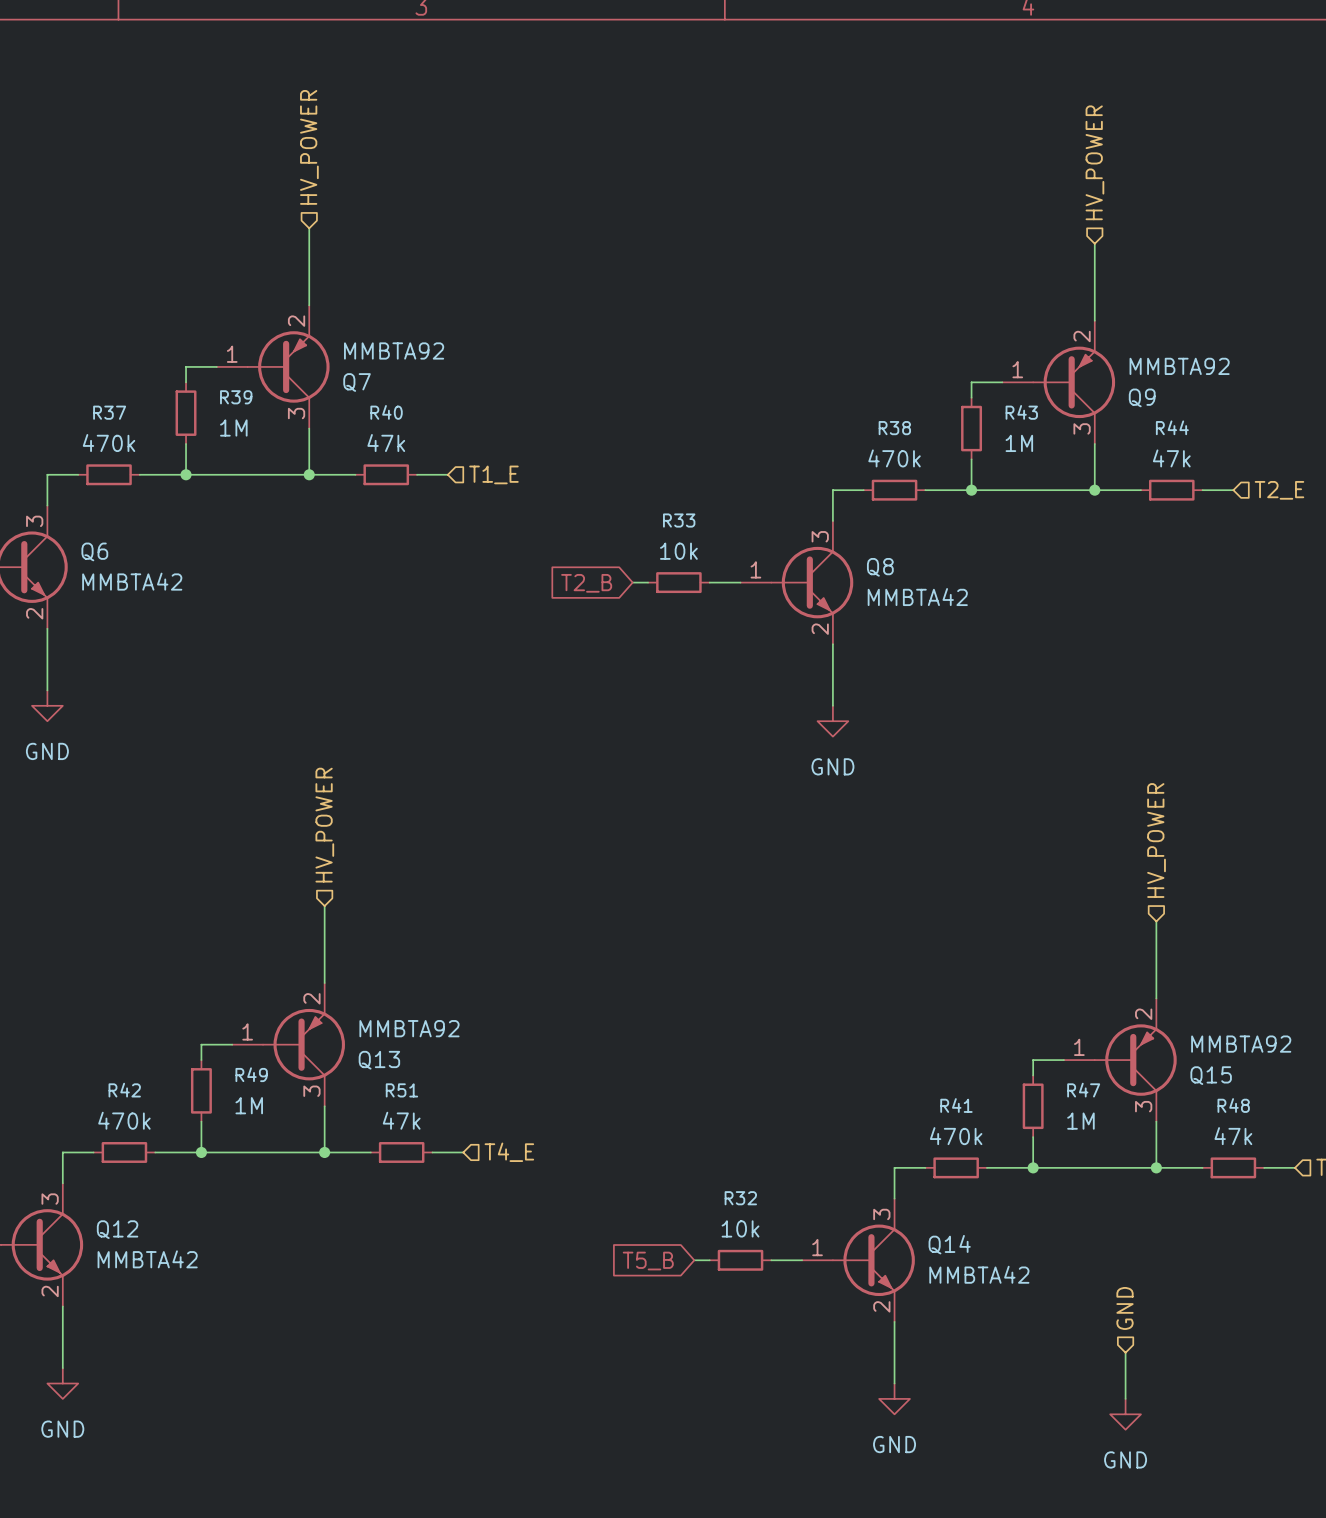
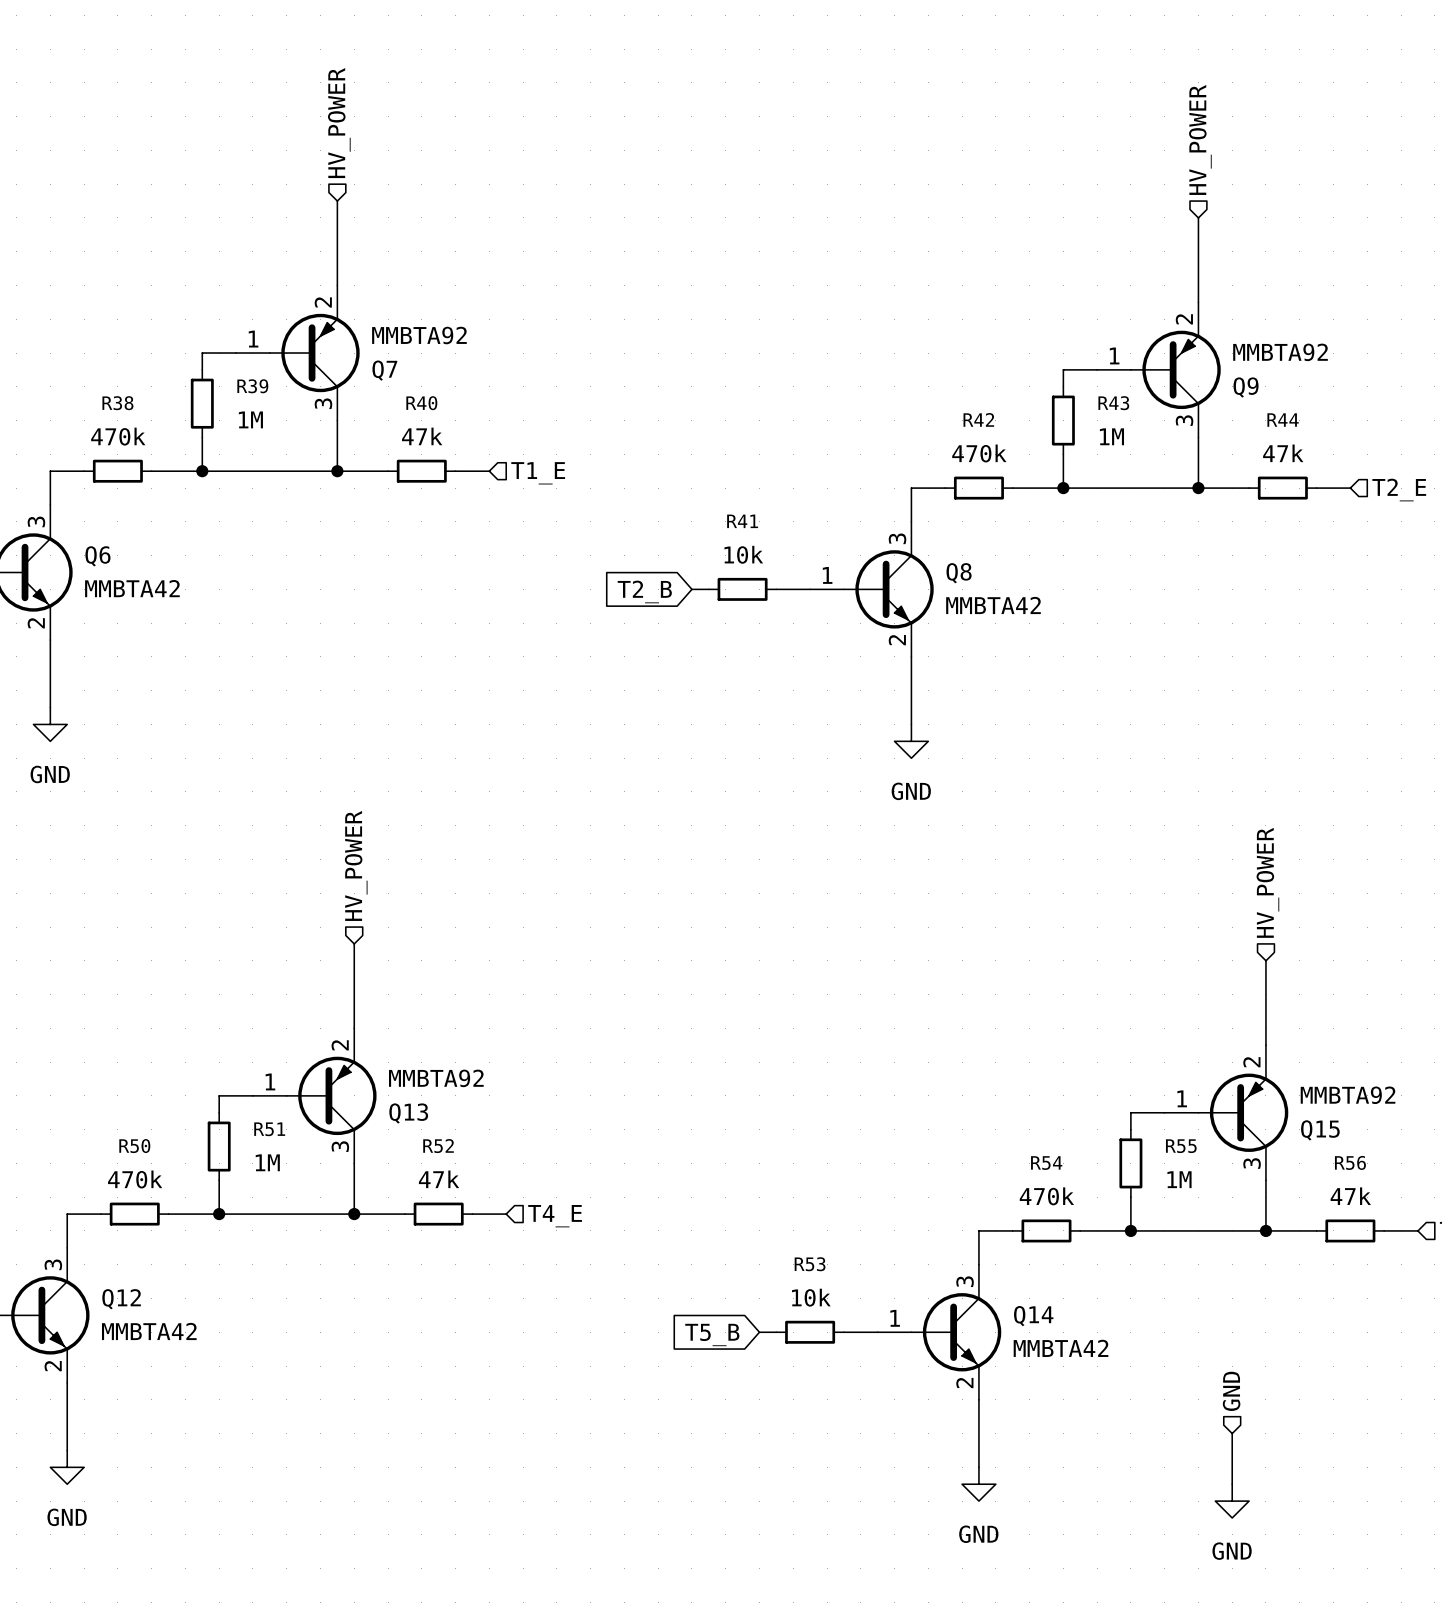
R37 name: R37 (109, 412) -> R38 (117, 403)
R38 name: R38 (894, 428) -> R42 (978, 419)
R33 name: R33 (679, 520) -> R41 (742, 521)
R49 name: R49 (251, 1074) -> R51 (269, 1129)
R42 name: R42 (124, 1090) -> R50 (134, 1146)
R51 name: R51 (401, 1090) -> R52 (438, 1146)
R47 name: R47 (1083, 1090) -> R55 (1181, 1146)
R41 name: R41 (956, 1105) -> R54 (1046, 1163)
R48 name: R48 (1233, 1105) -> R56 (1350, 1162)
R32 name: R32 (740, 1198) -> R53 (810, 1264)

